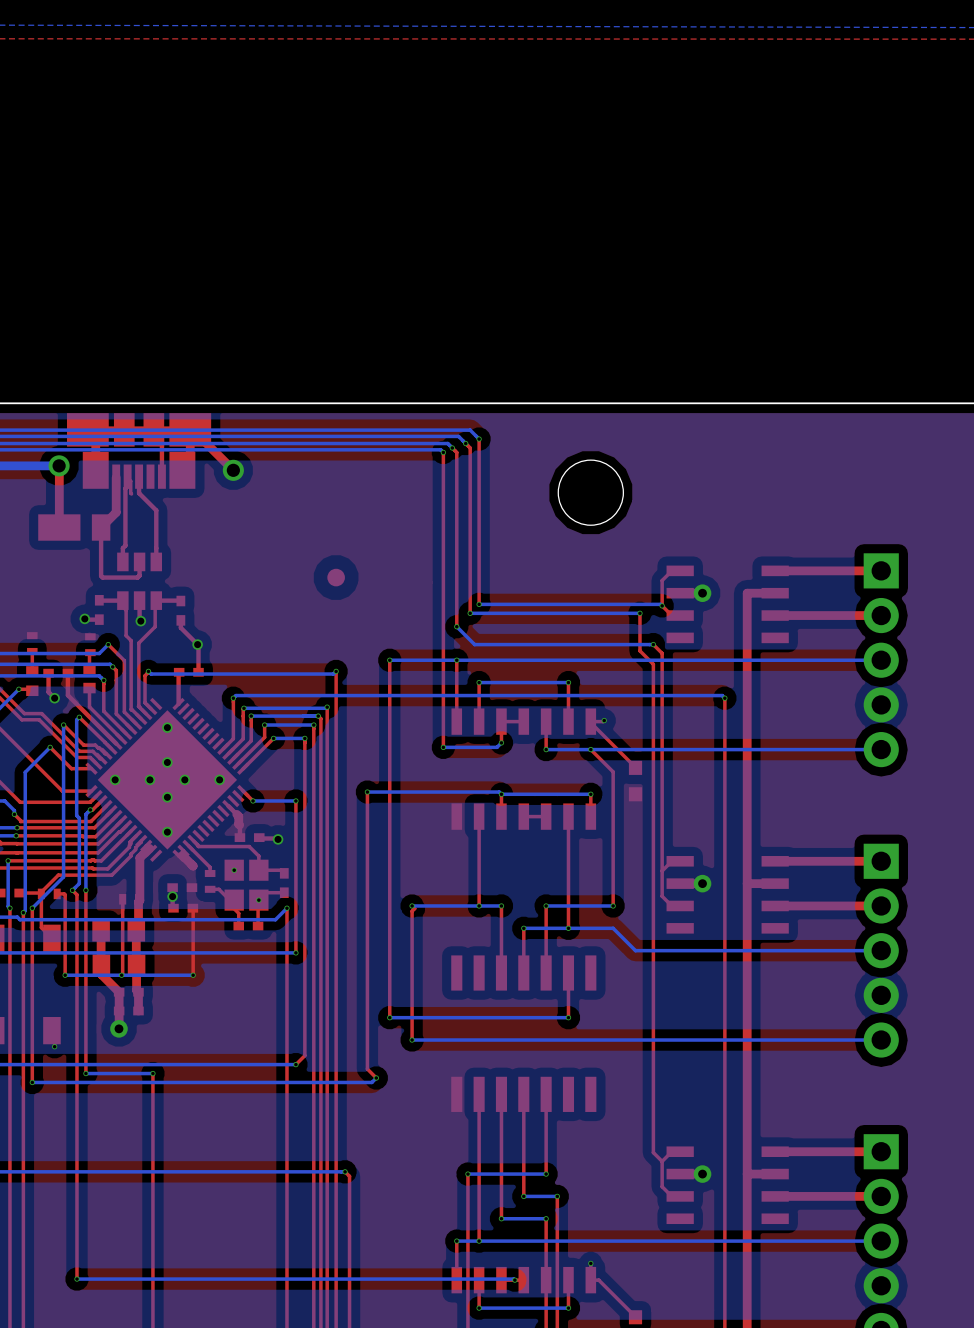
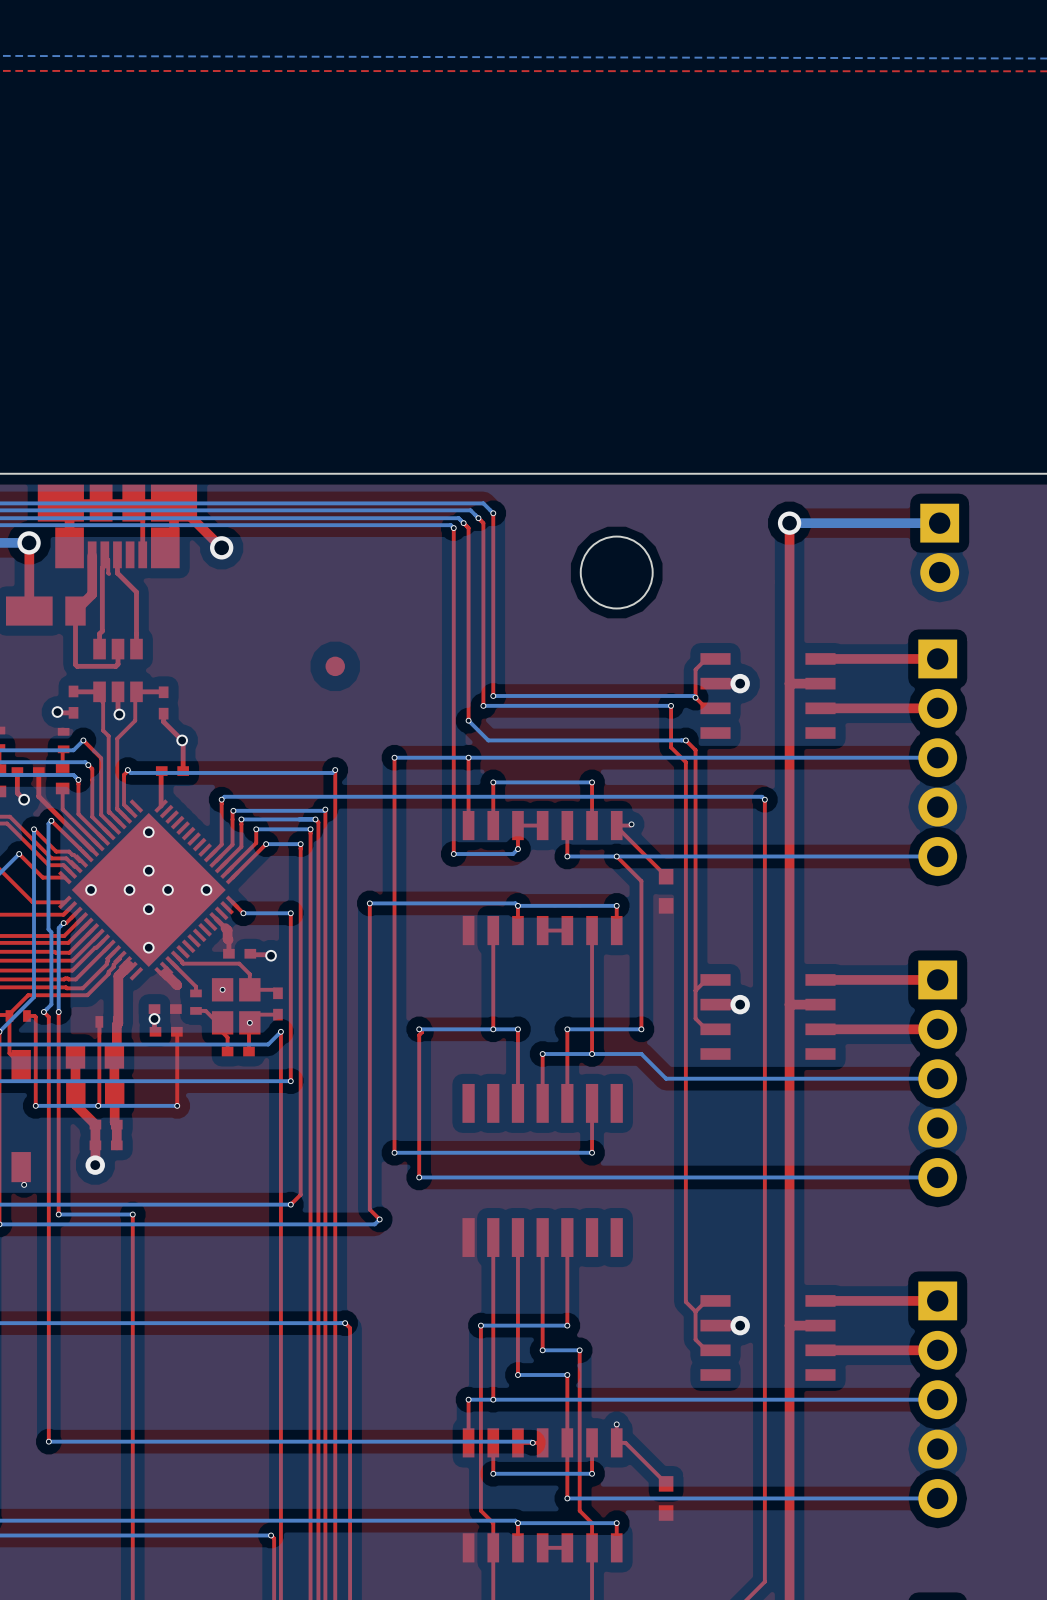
top track: none -> (789, 523) (789, 683)
via: none -> (789, 523)
bottom track: none -> (939, 523) (789, 523)
part: none -> (939, 547)

